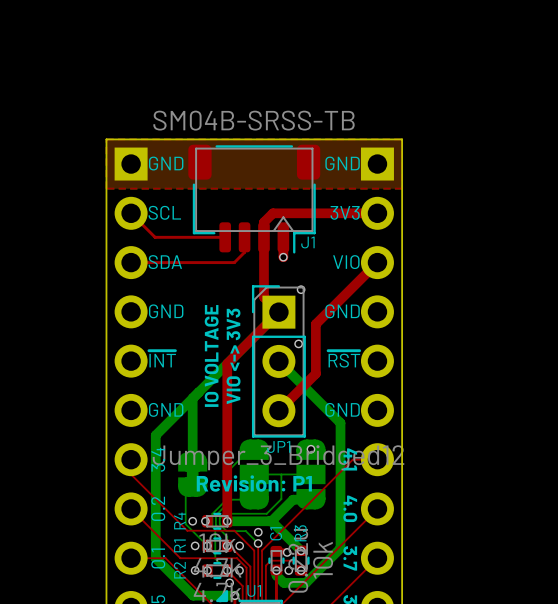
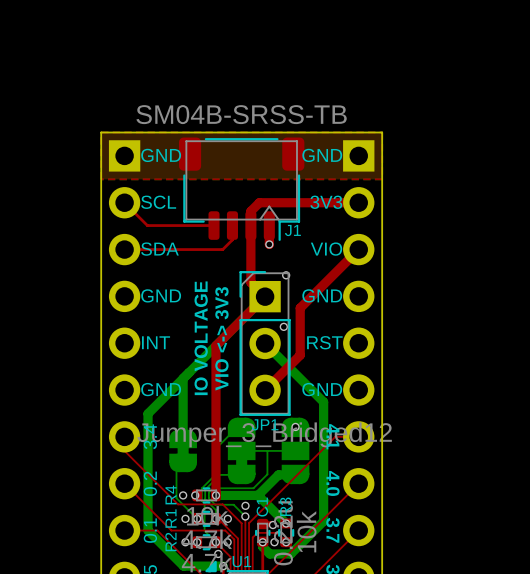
text: ~{INT} (162, 359) -> INT (156, 342)
text: ~{RST} (344, 359) -> RST (324, 342)
text: Revision: P1 (254, 483) -> none

